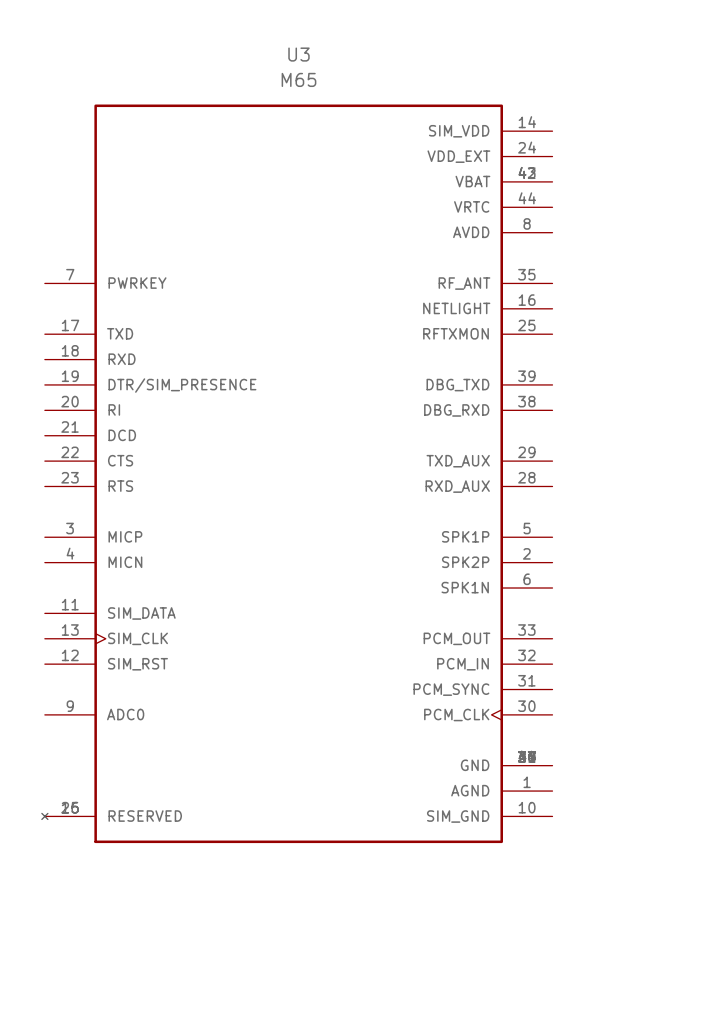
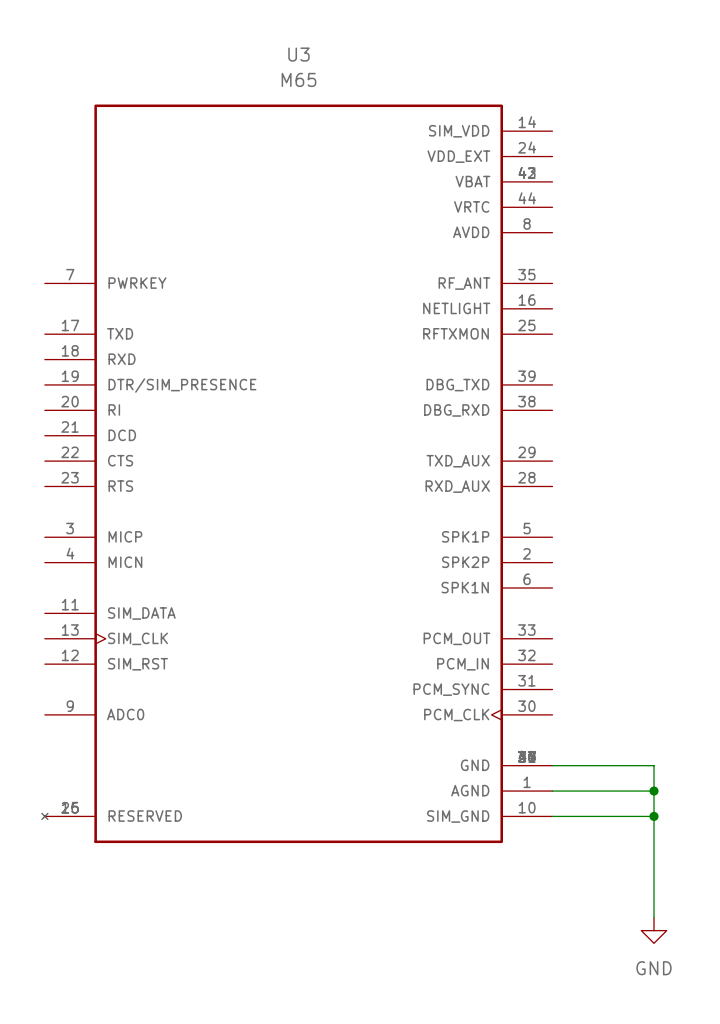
wire: none -> (552, 765) (654, 765) (654, 917)
wire: none -> (552, 791) (654, 791)
junction: none -> (654, 791)
wire: none -> (552, 816) (654, 816)
junction: none -> (654, 816)
power symbol: none -> GND (654, 930)

